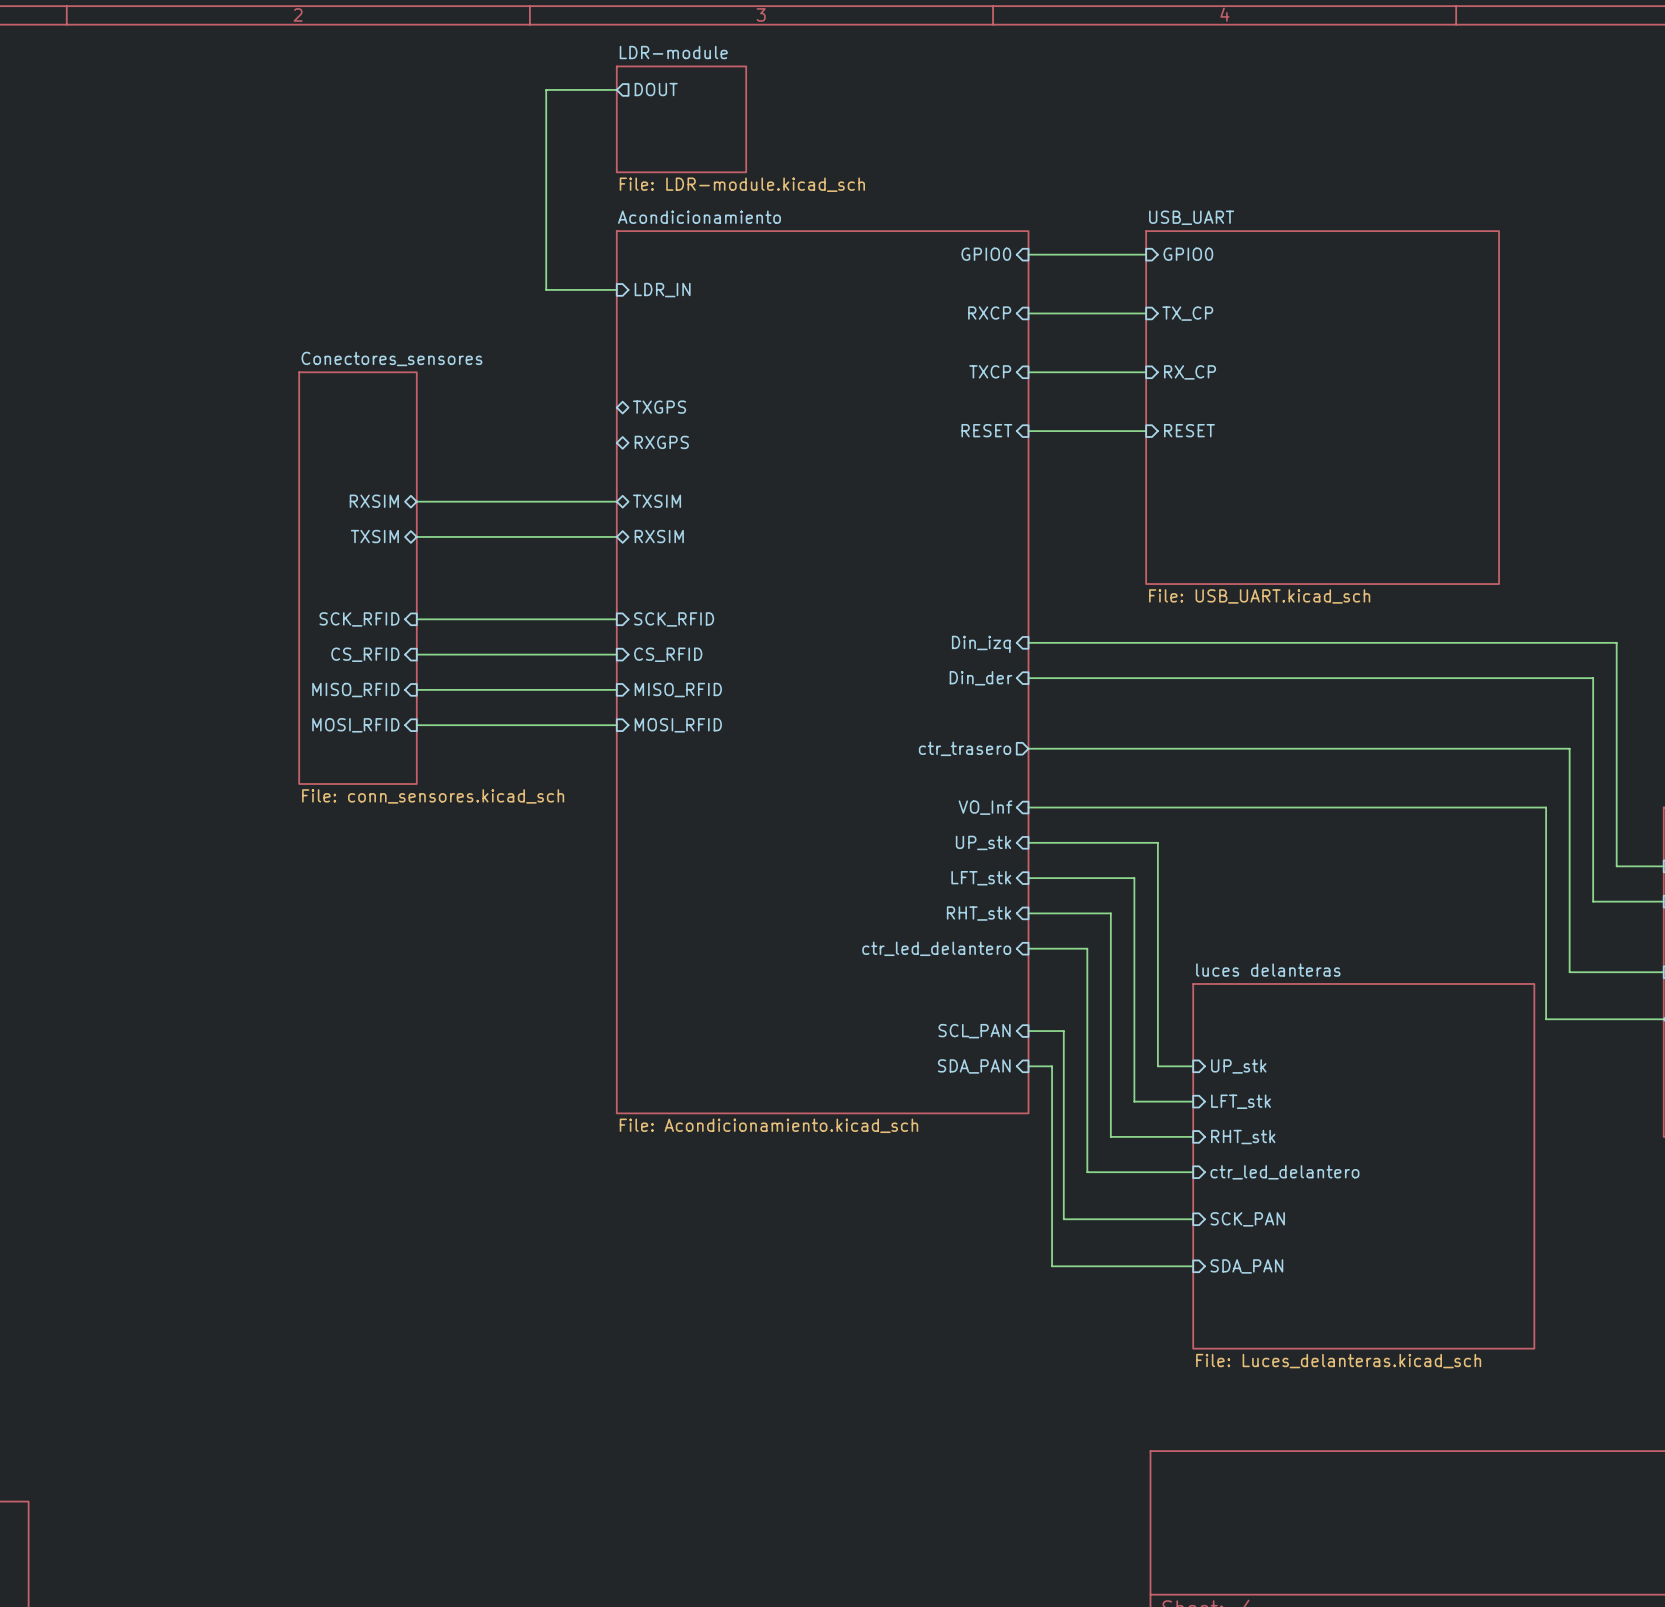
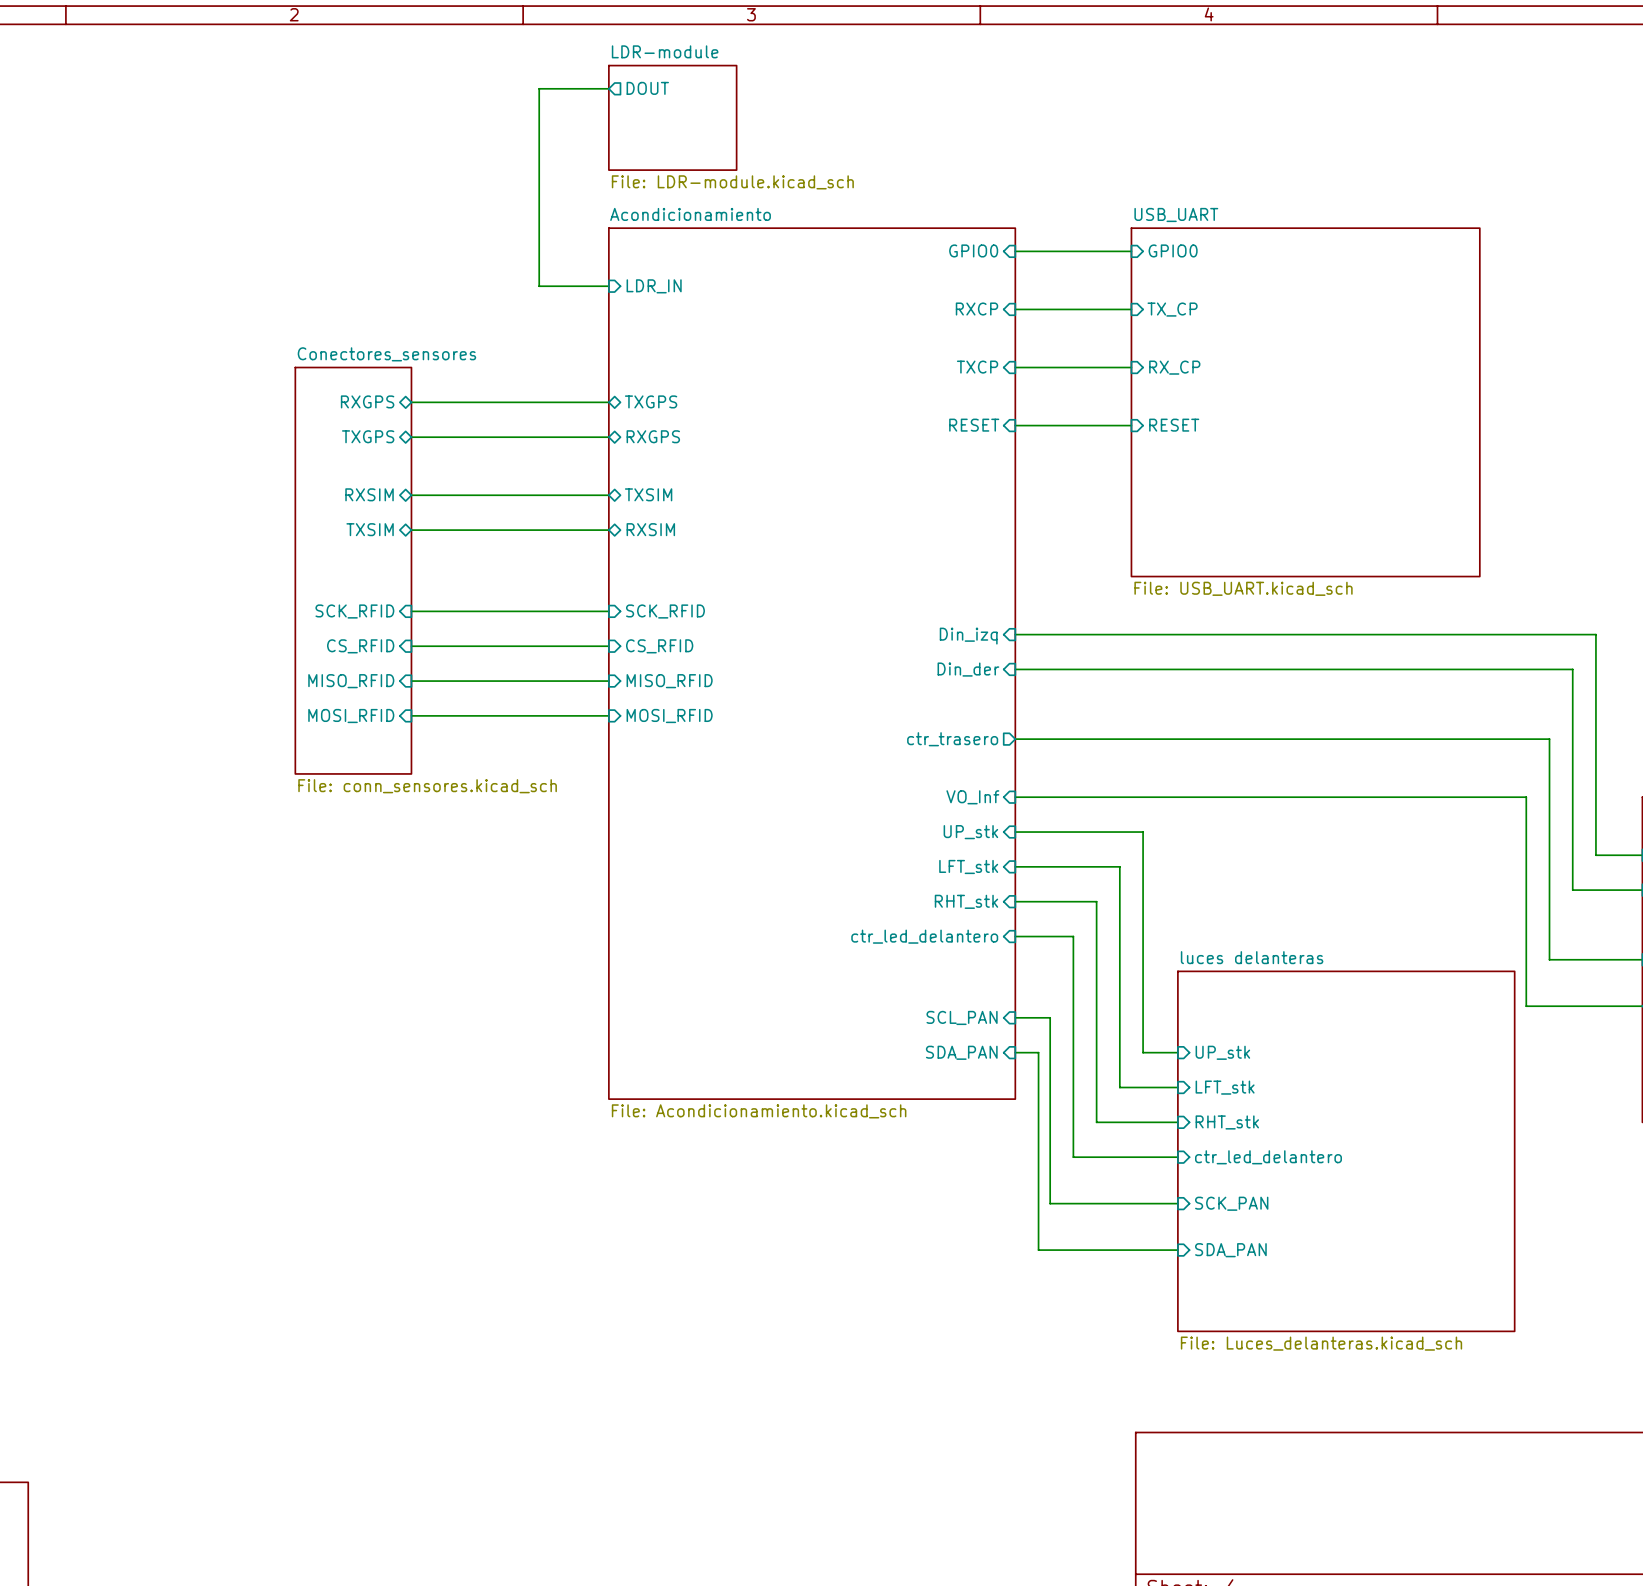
sheet pin: none -> RXGPS (367, 401)
wire: none -> (411, 402) (608, 402)
sheet pin: none -> TXGPS (368, 436)
wire: none -> (411, 437) (608, 437)

